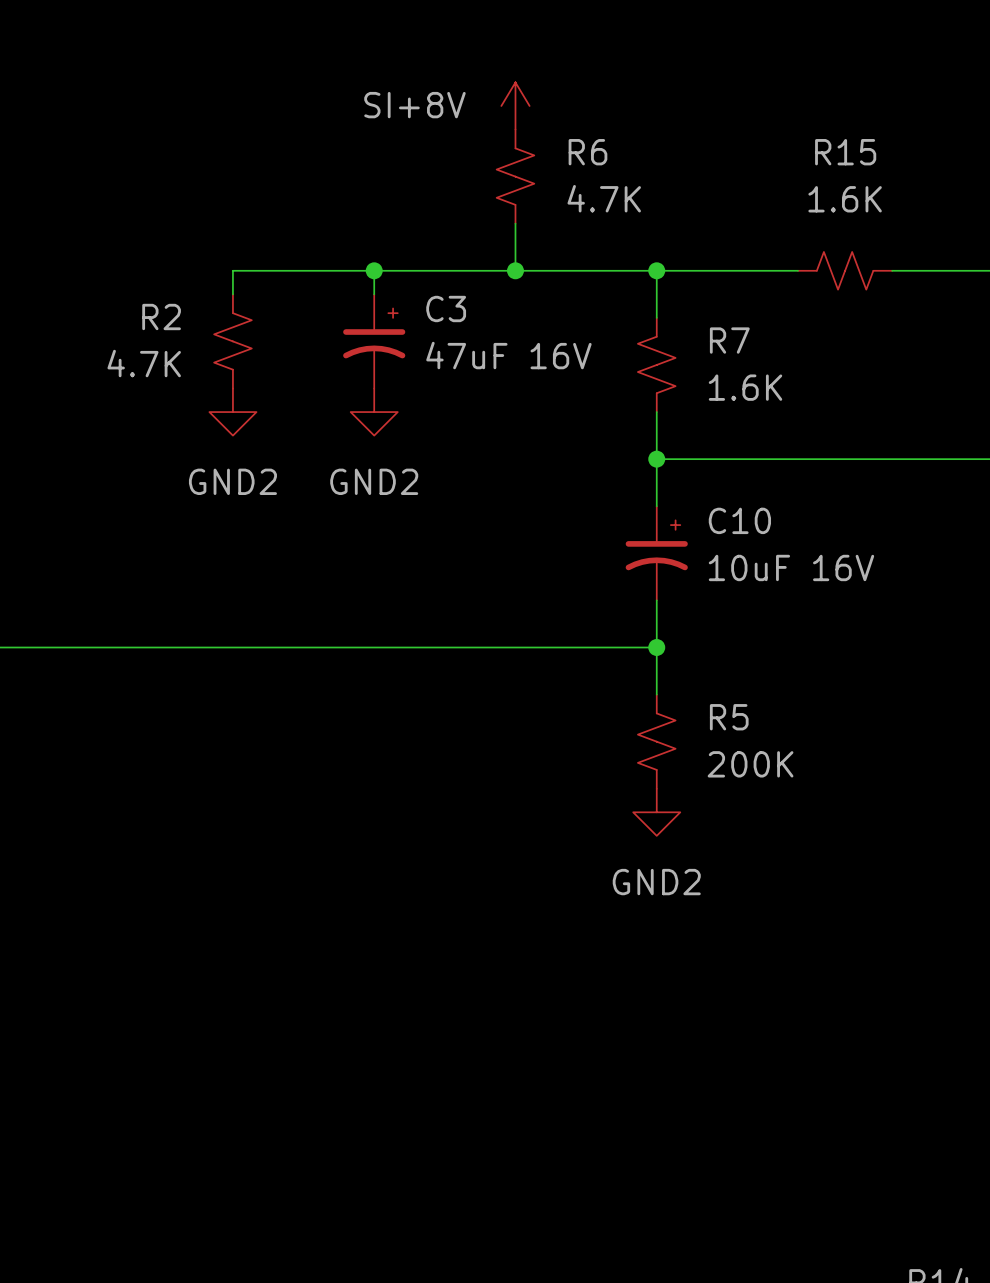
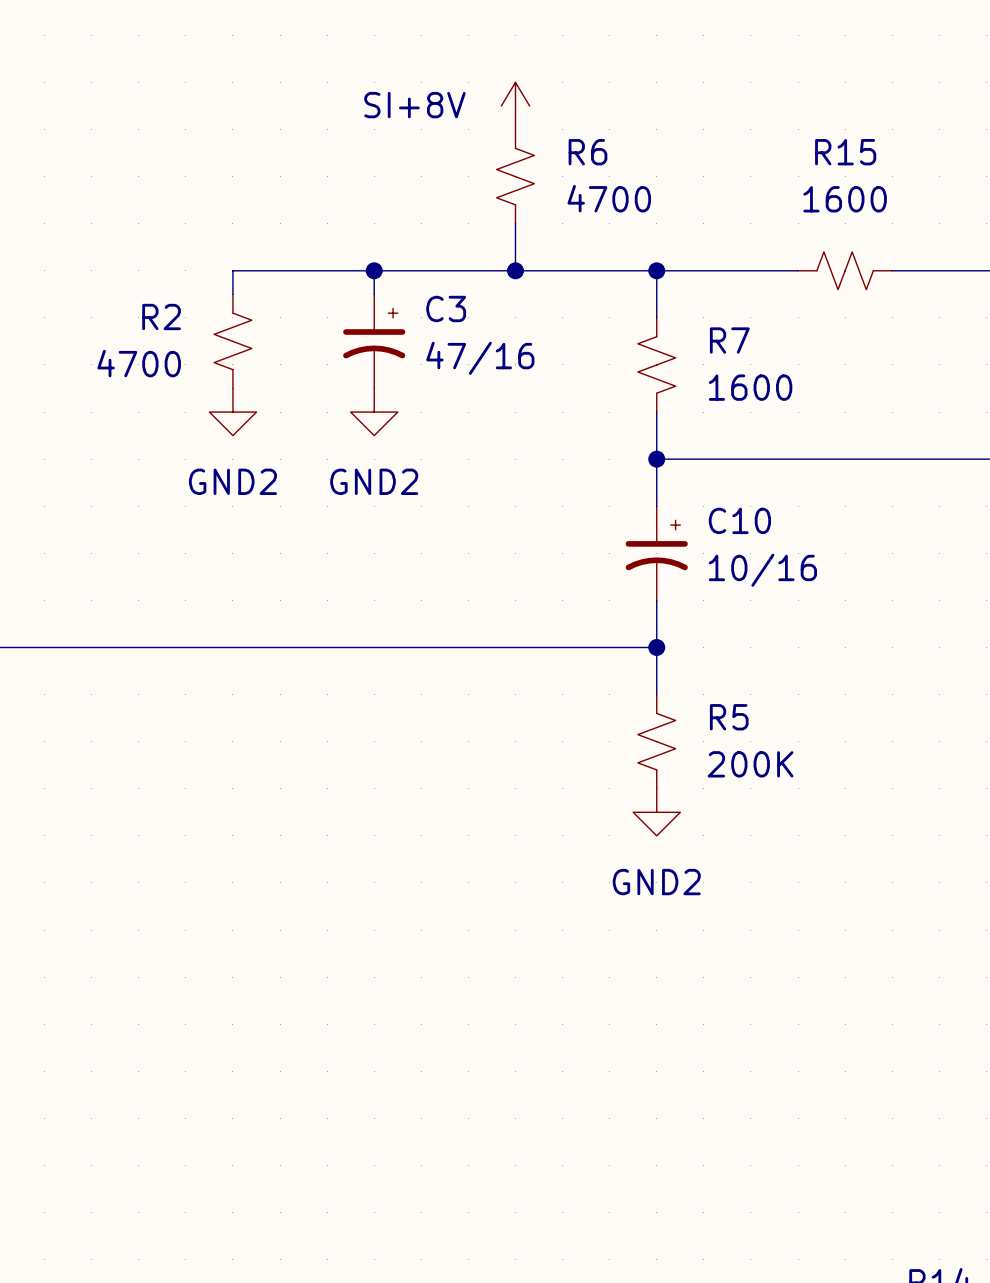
R6 value: 4.7K (604, 198) -> 4700 (609, 198)
R15 value: 1.6K (845, 199) -> 1600 (845, 199)
C3 value: 47uF 16V (508, 355) -> 47/16 (480, 358)
R2 value: 4.7K (144, 363) -> 4700 (139, 363)
R7 value: 1.6K (745, 387) -> 1600 (750, 387)
C10 value: 10uF 16V (791, 567) -> 10/16 (762, 570)

